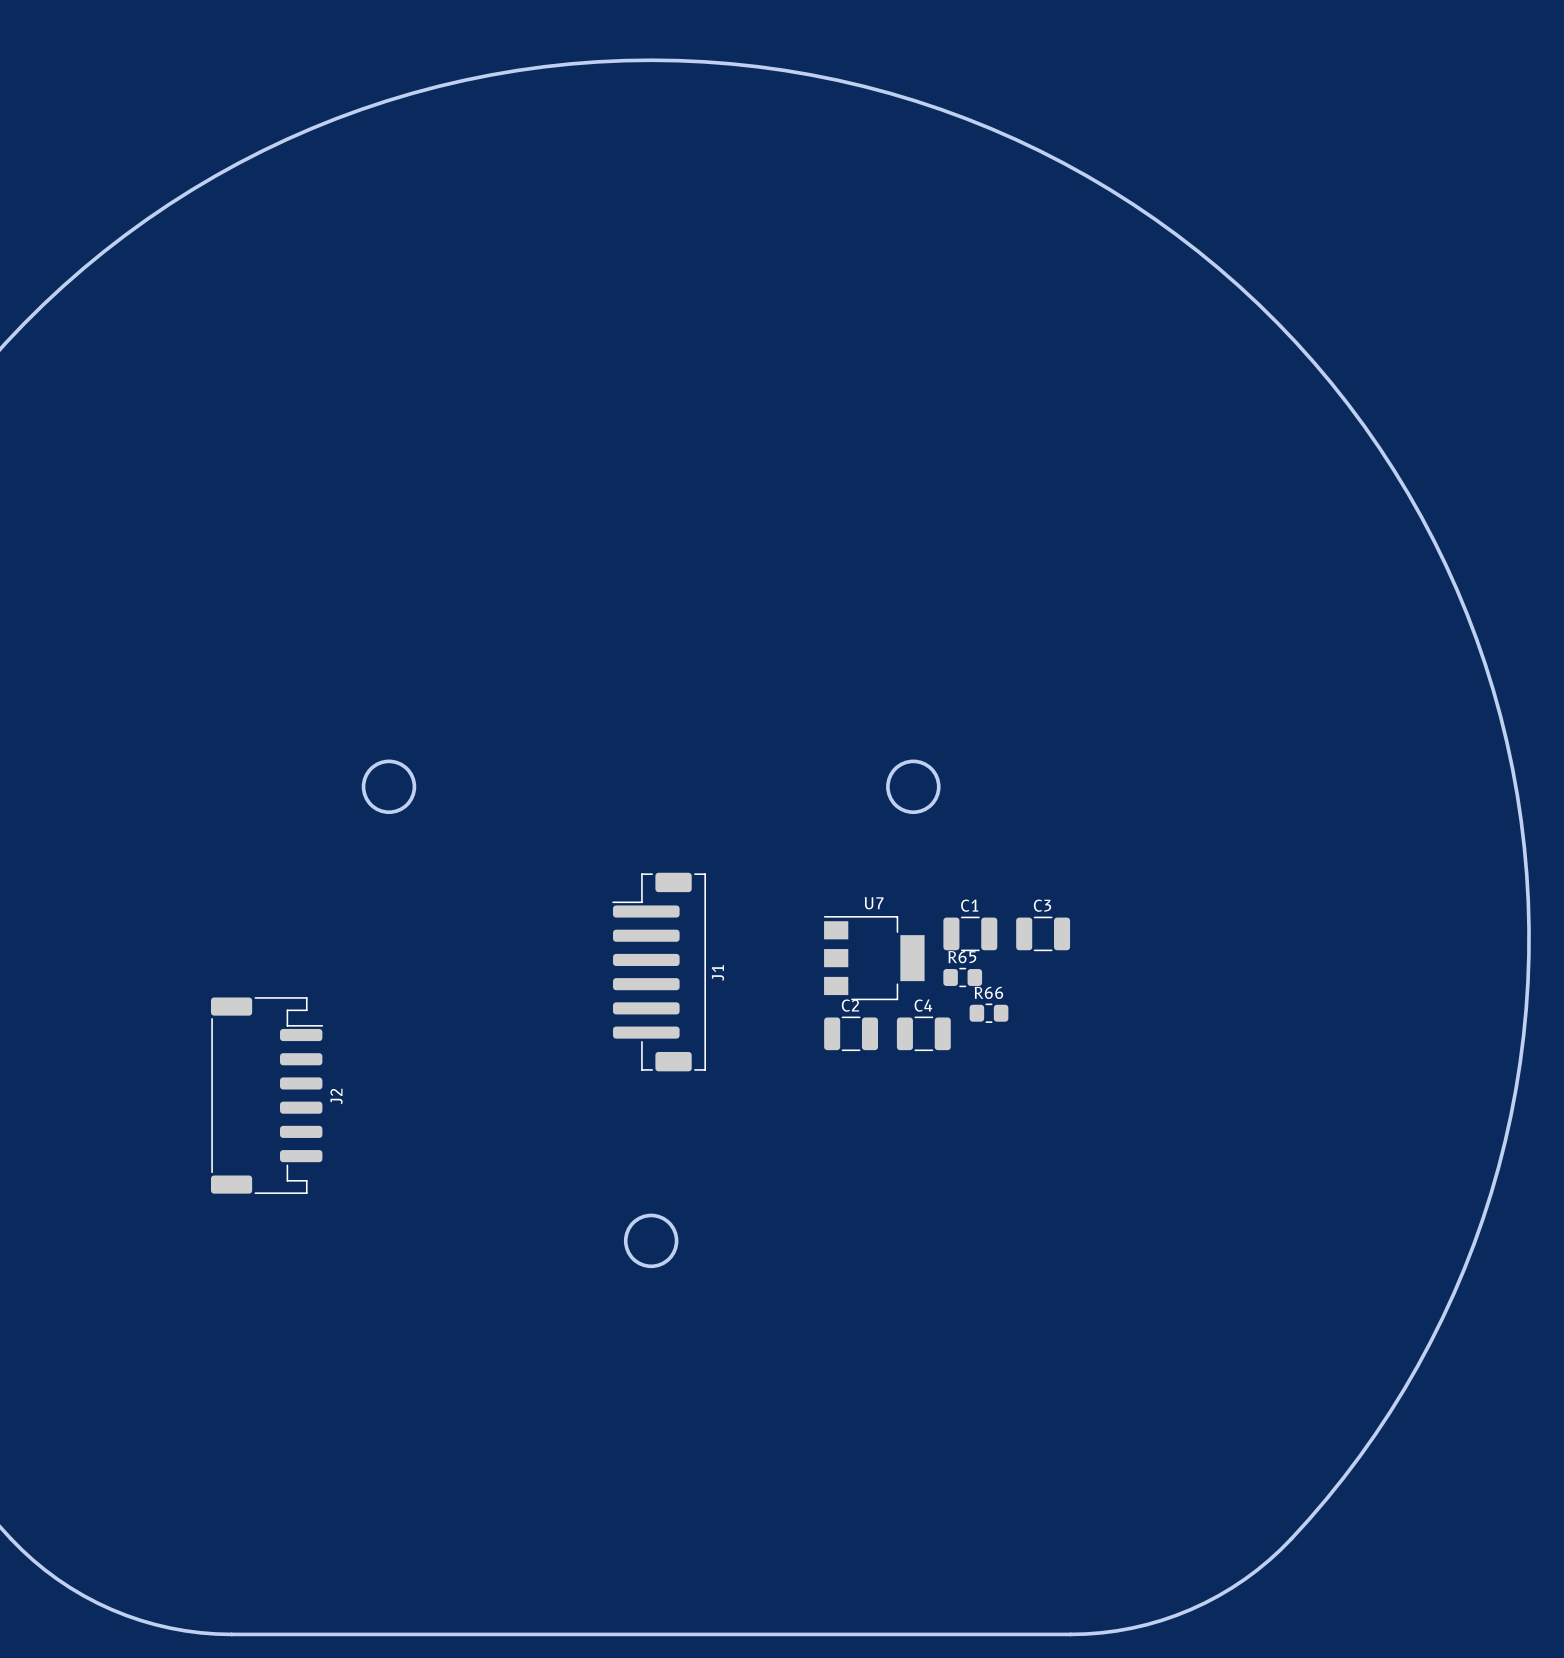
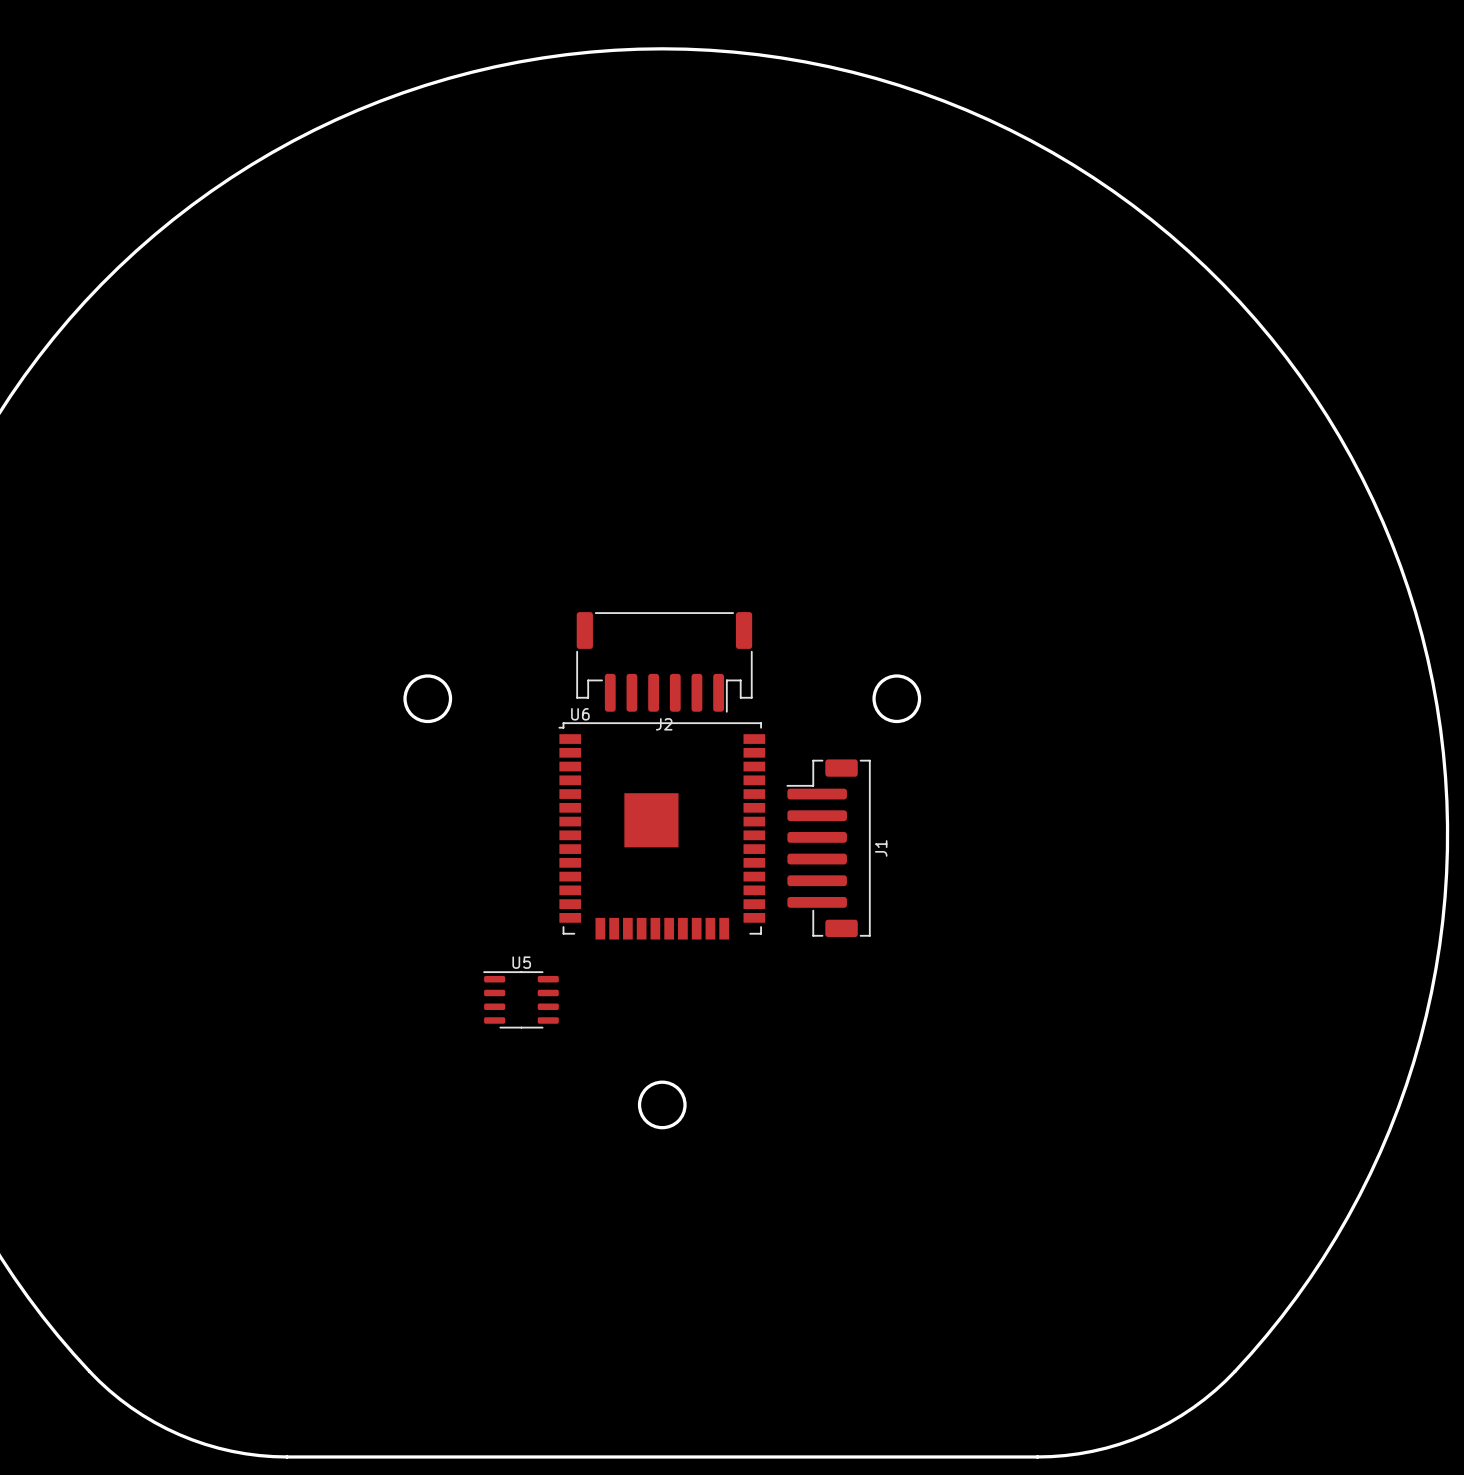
C1: (970, 933) -> none
C3: (1043, 933) -> none
U6: none -> (661, 831)
U7: (874, 958) -> none
J1 position: (659, 972) -> (828, 848)
R65: (962, 977) -> none
R66: (988, 1013) -> none
C2: (851, 1033) -> none
C4: (923, 1033) -> none
J2 rotation: 0° (267, 1095) -> 90° clockwise (664, 662)
J2 position: (267, 1095) -> (664, 662)
U5: none -> (521, 999)

